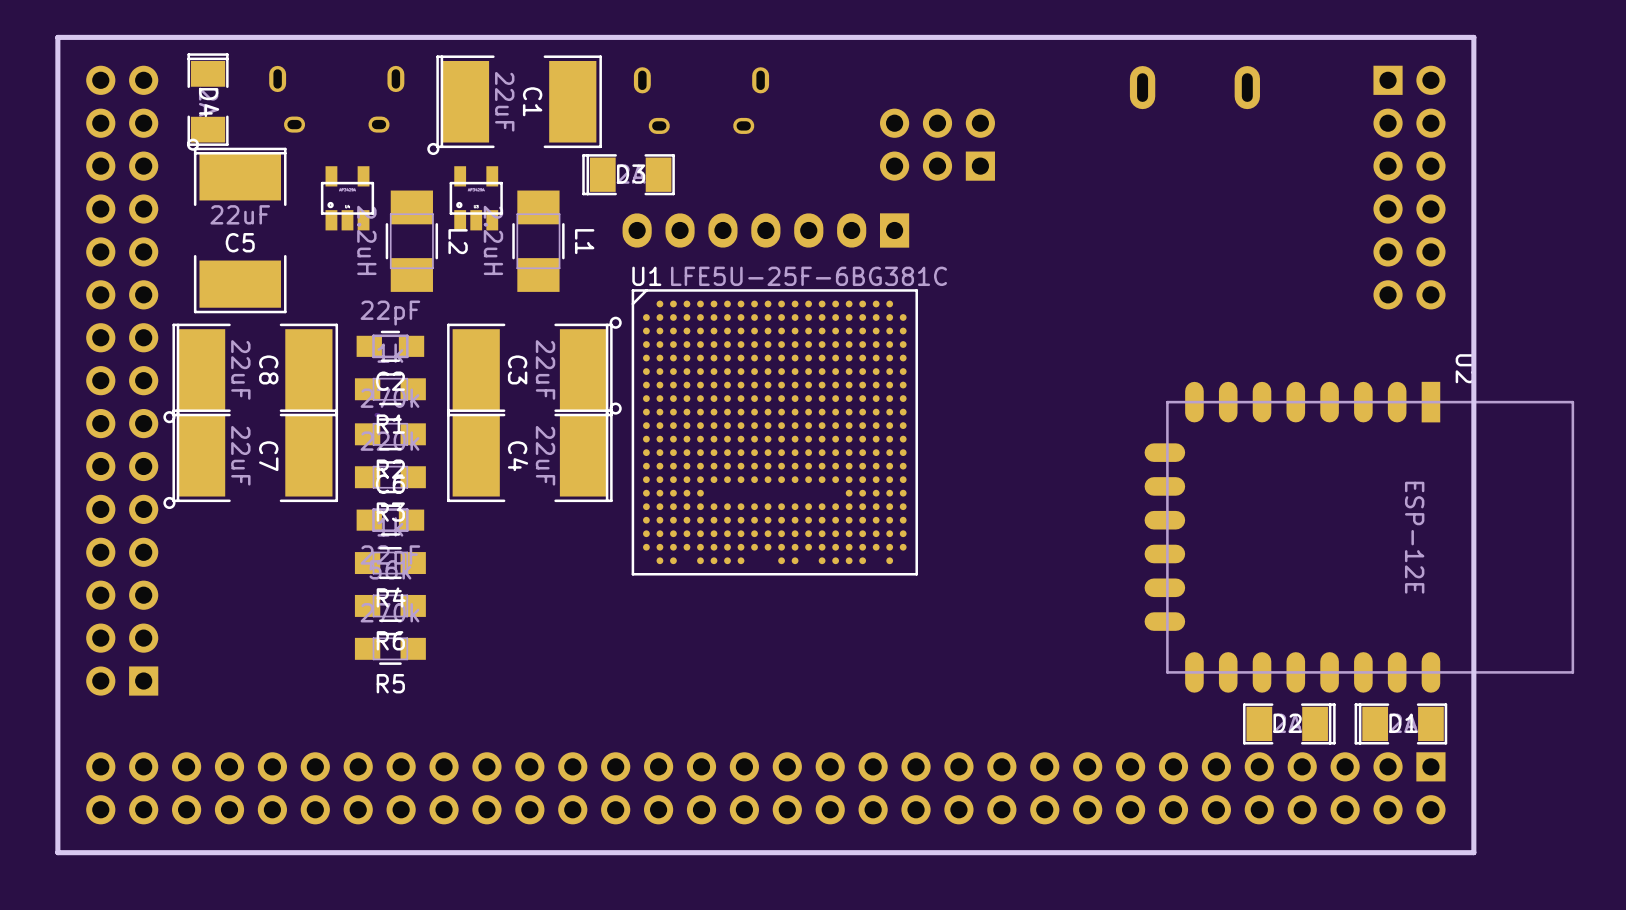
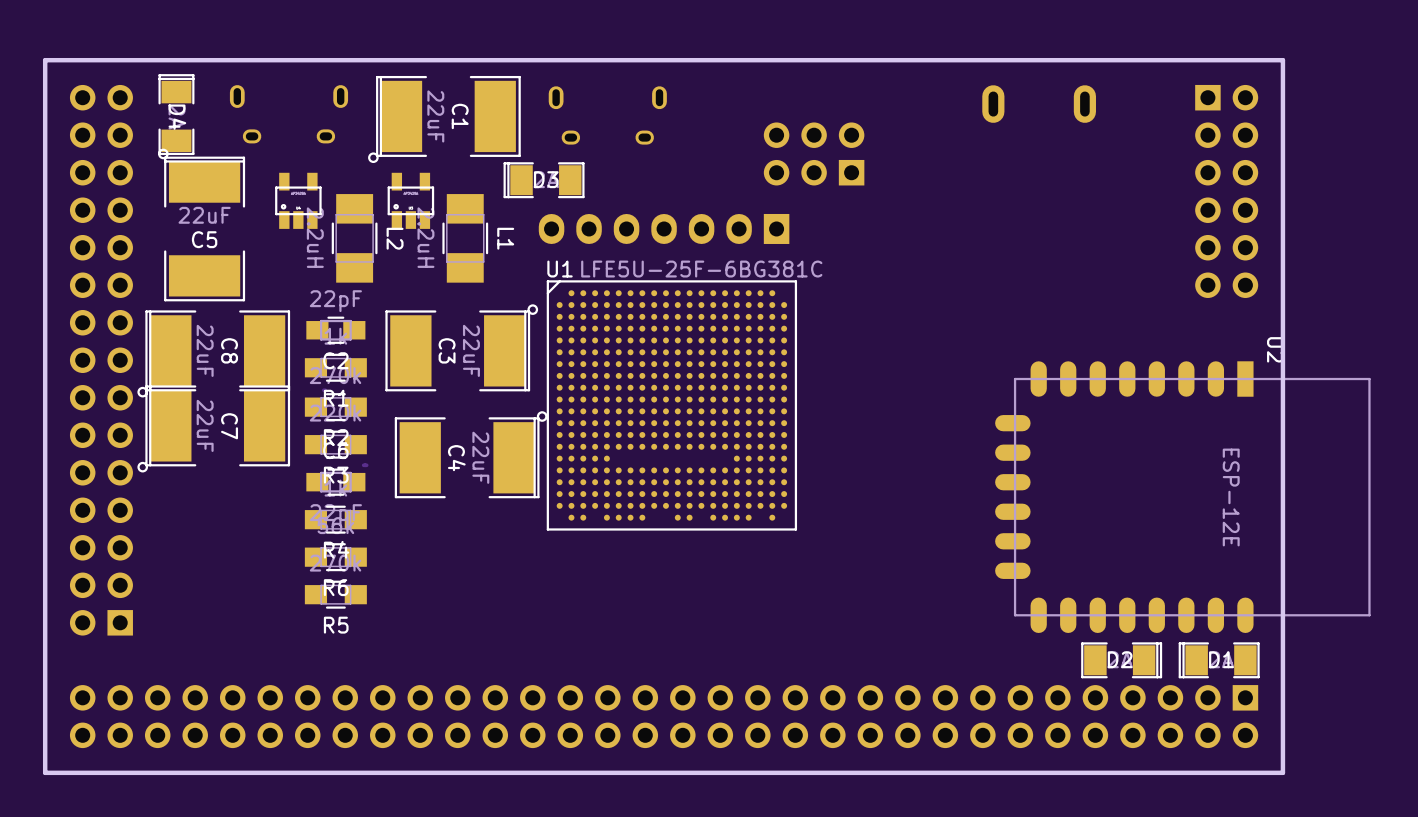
C4 position: (534, 452) -> (471, 454)
track: none -> (366, 465) (363, 465)

